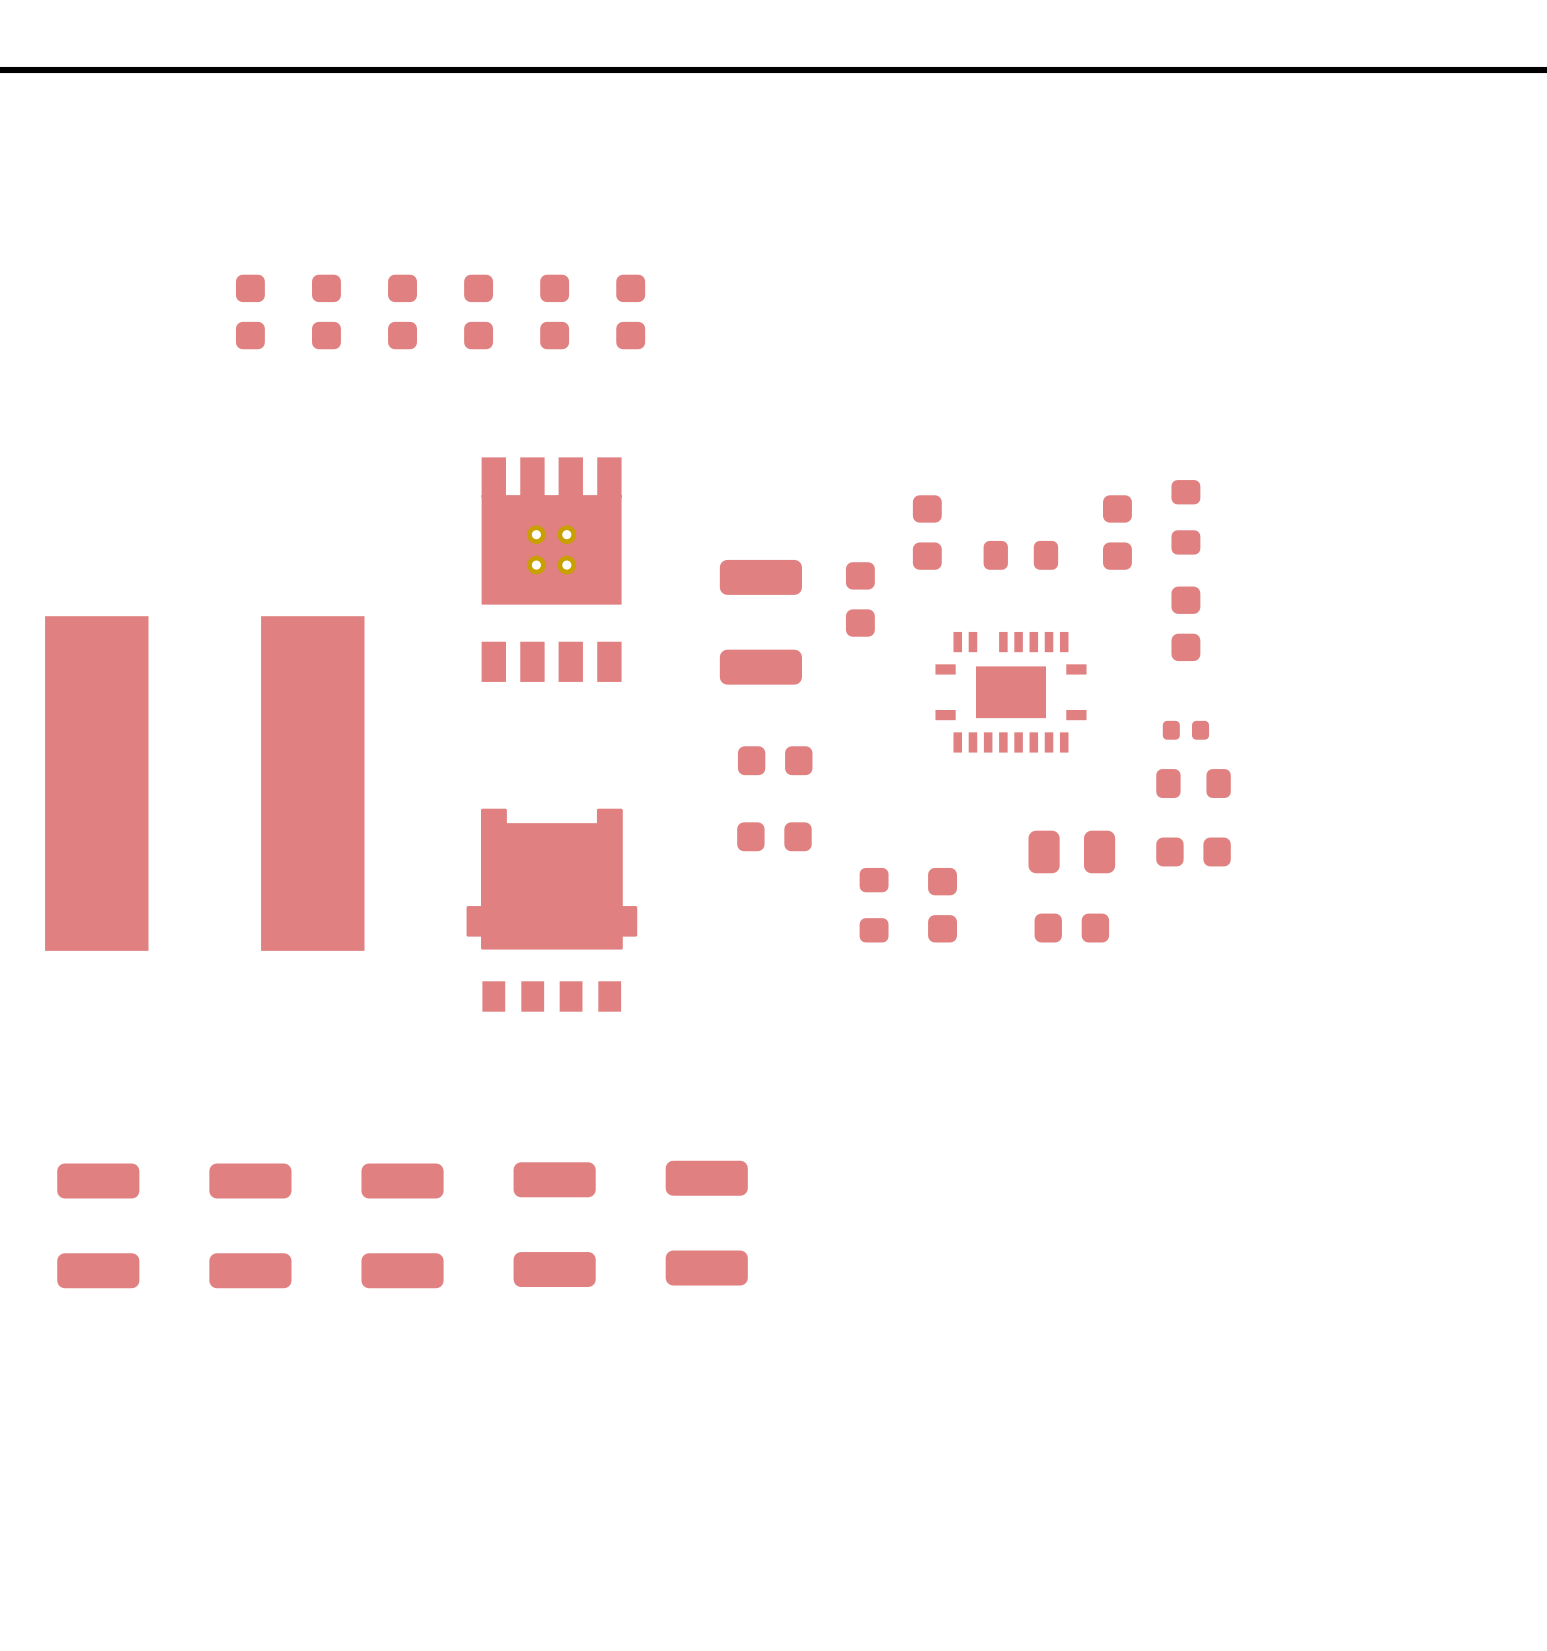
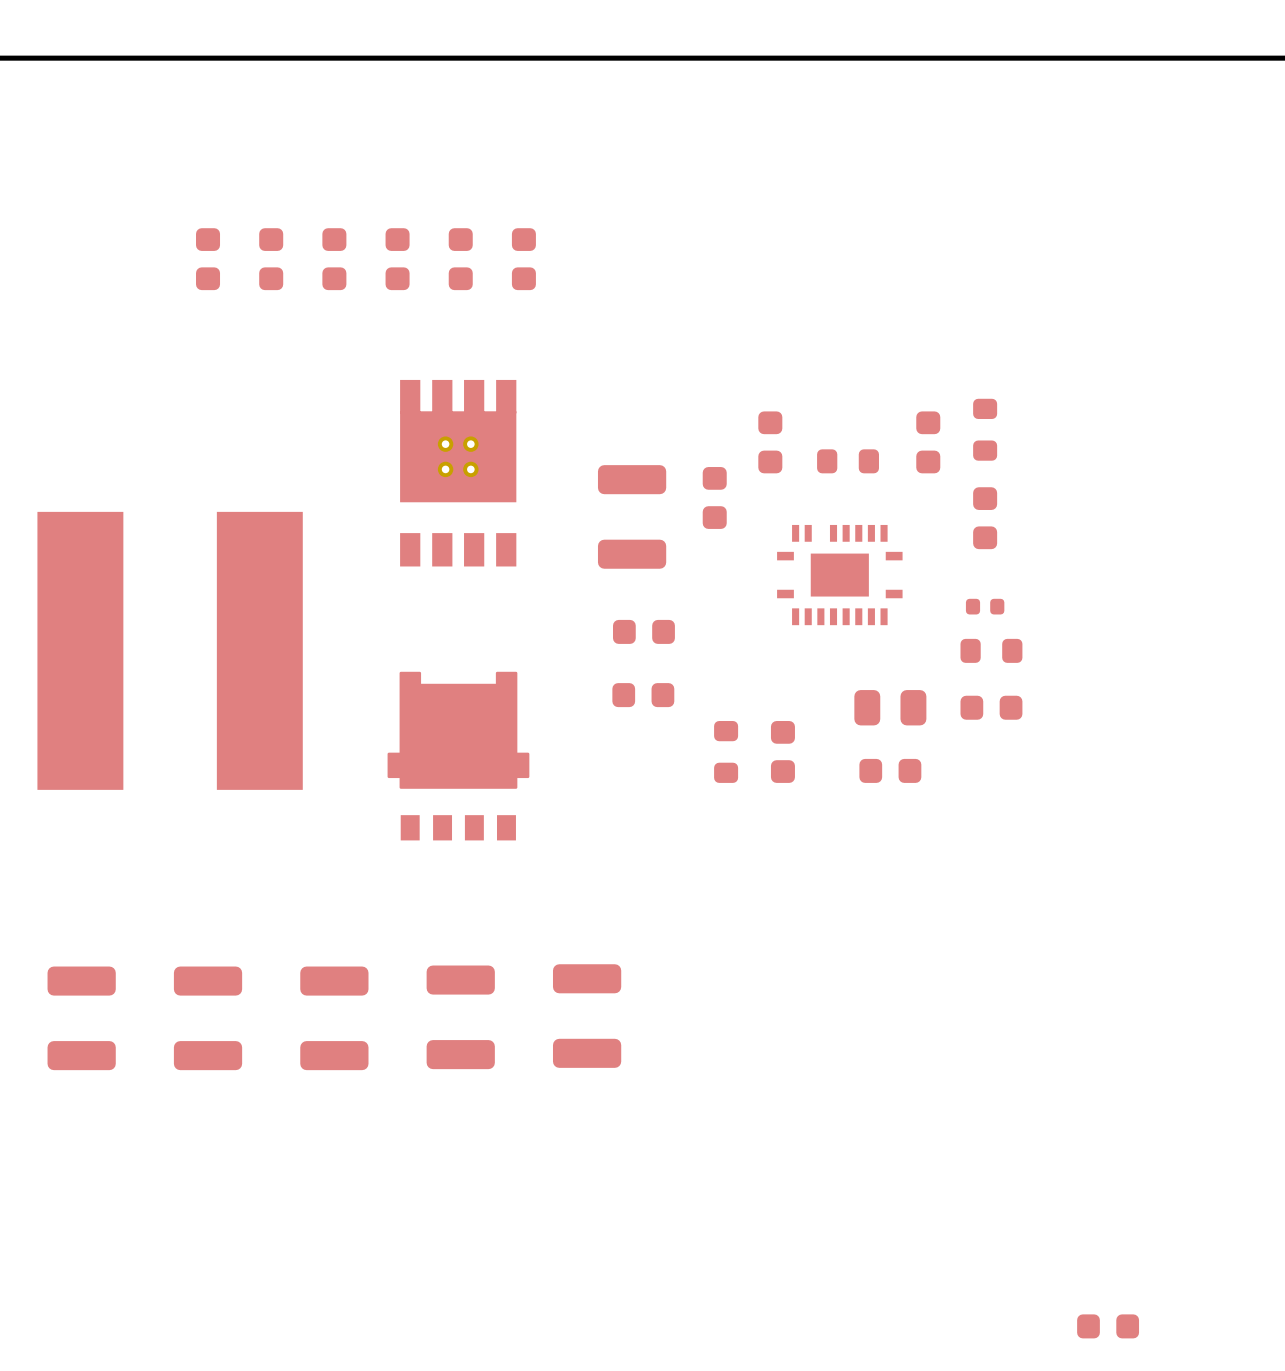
part: none -> (1108, 1326)

